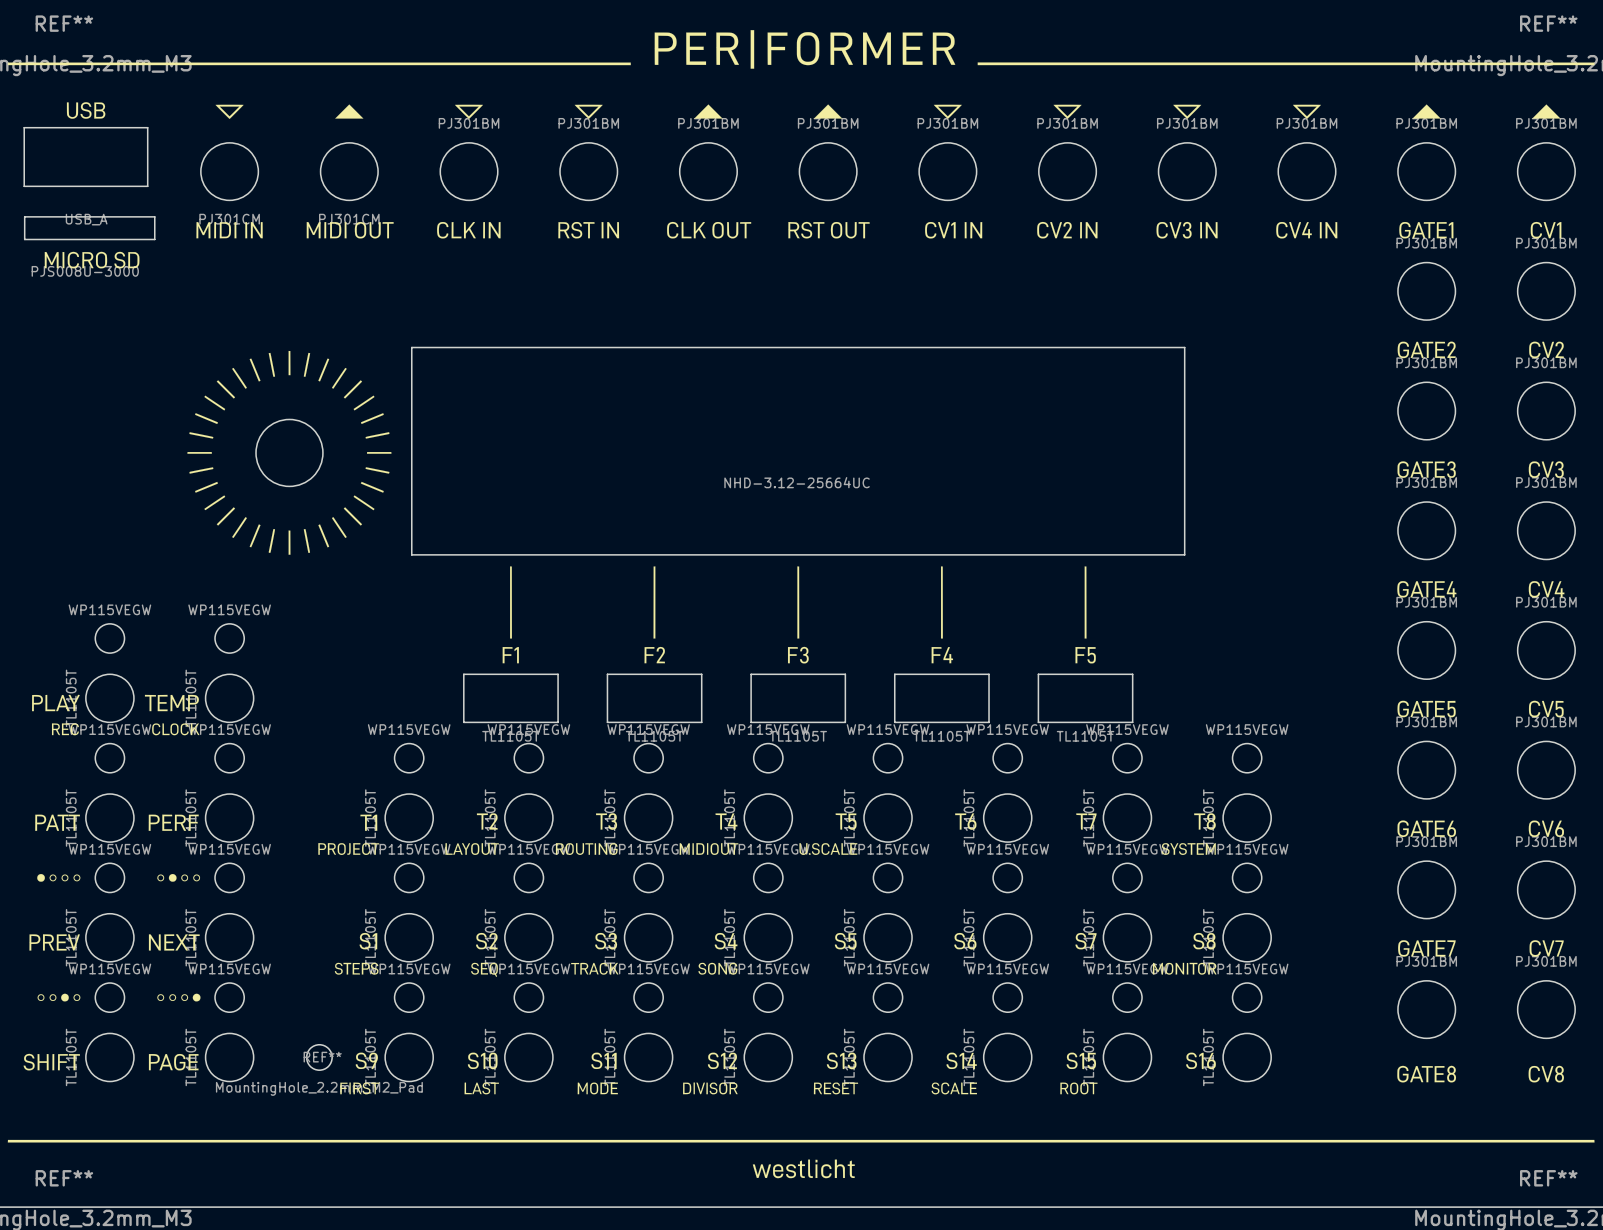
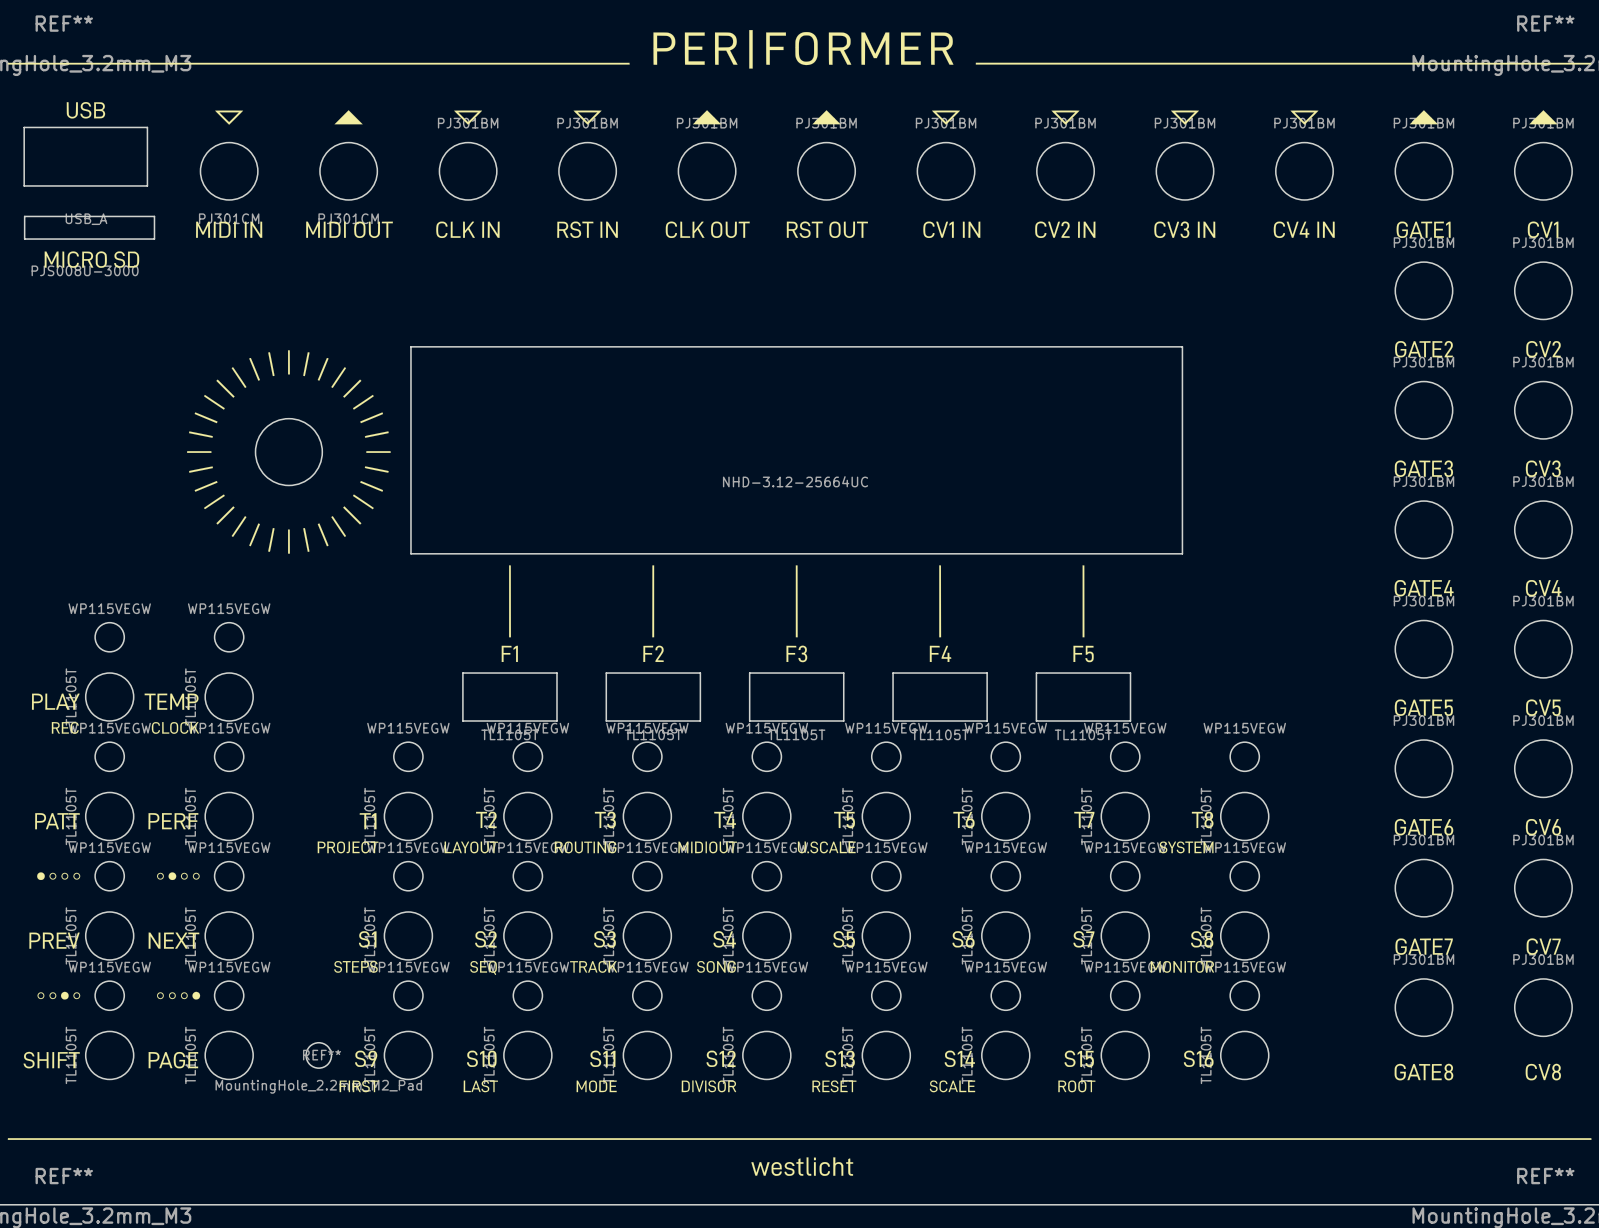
drawing shape: [7, 30, 1595, 1179] -> [7, 30, 1592, 1176]

